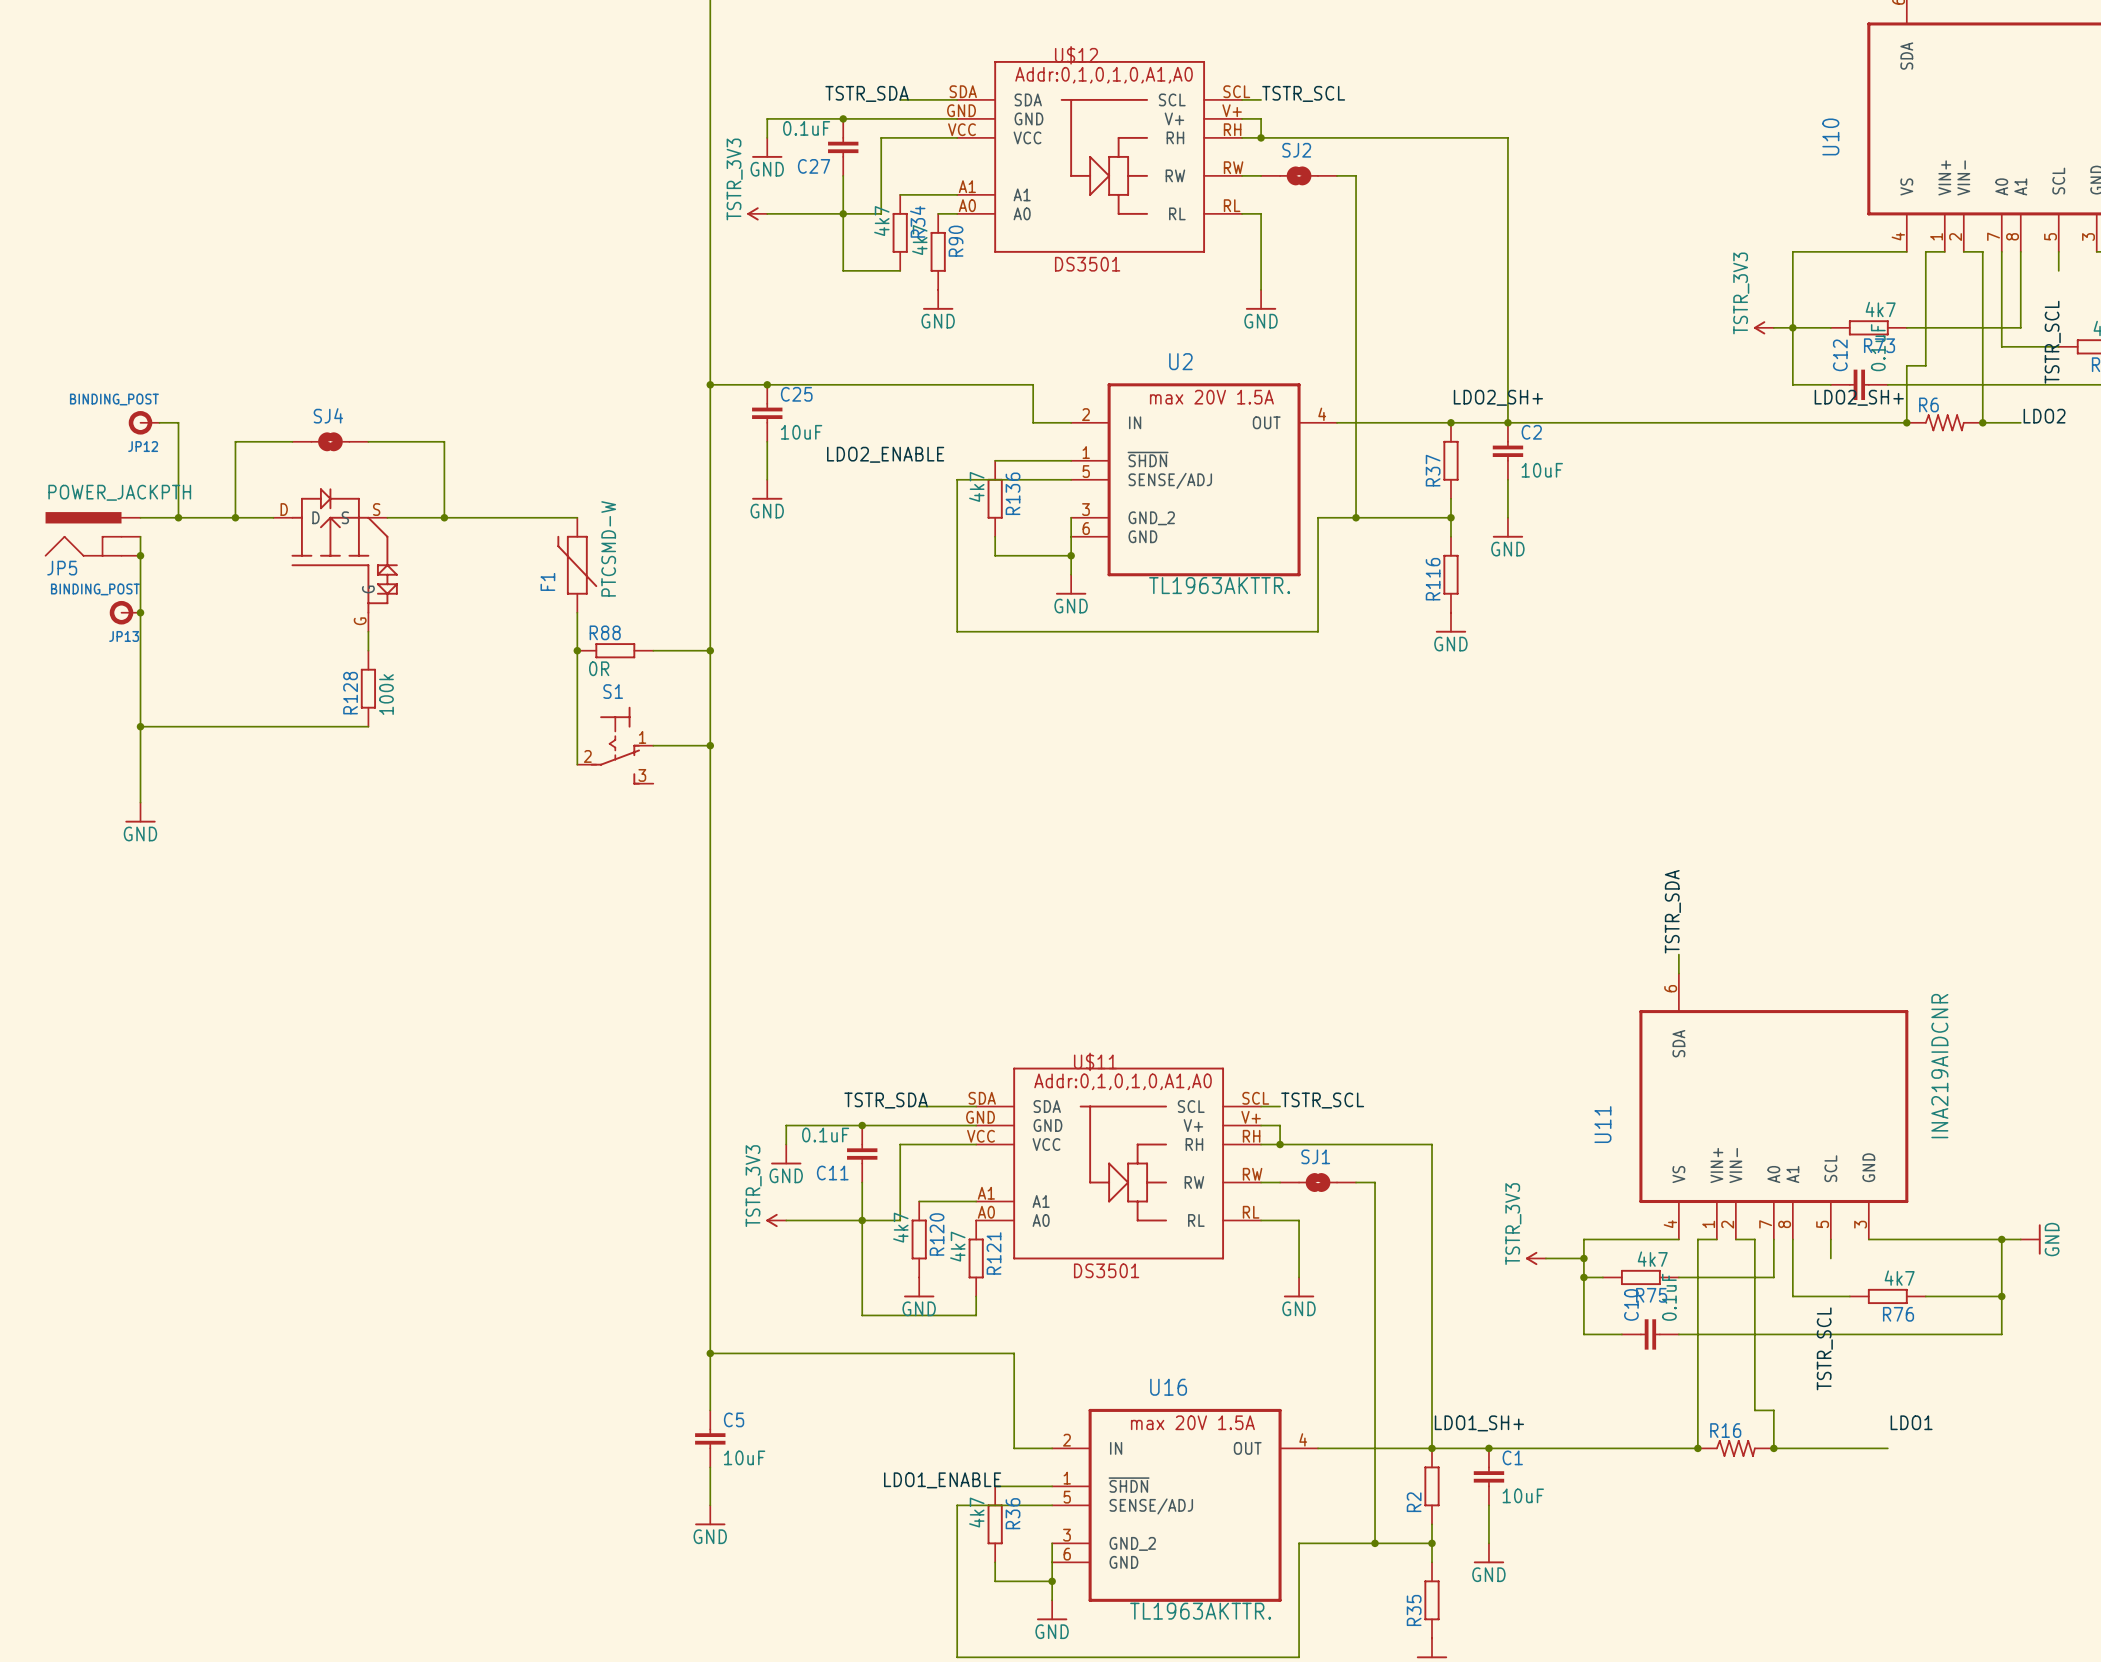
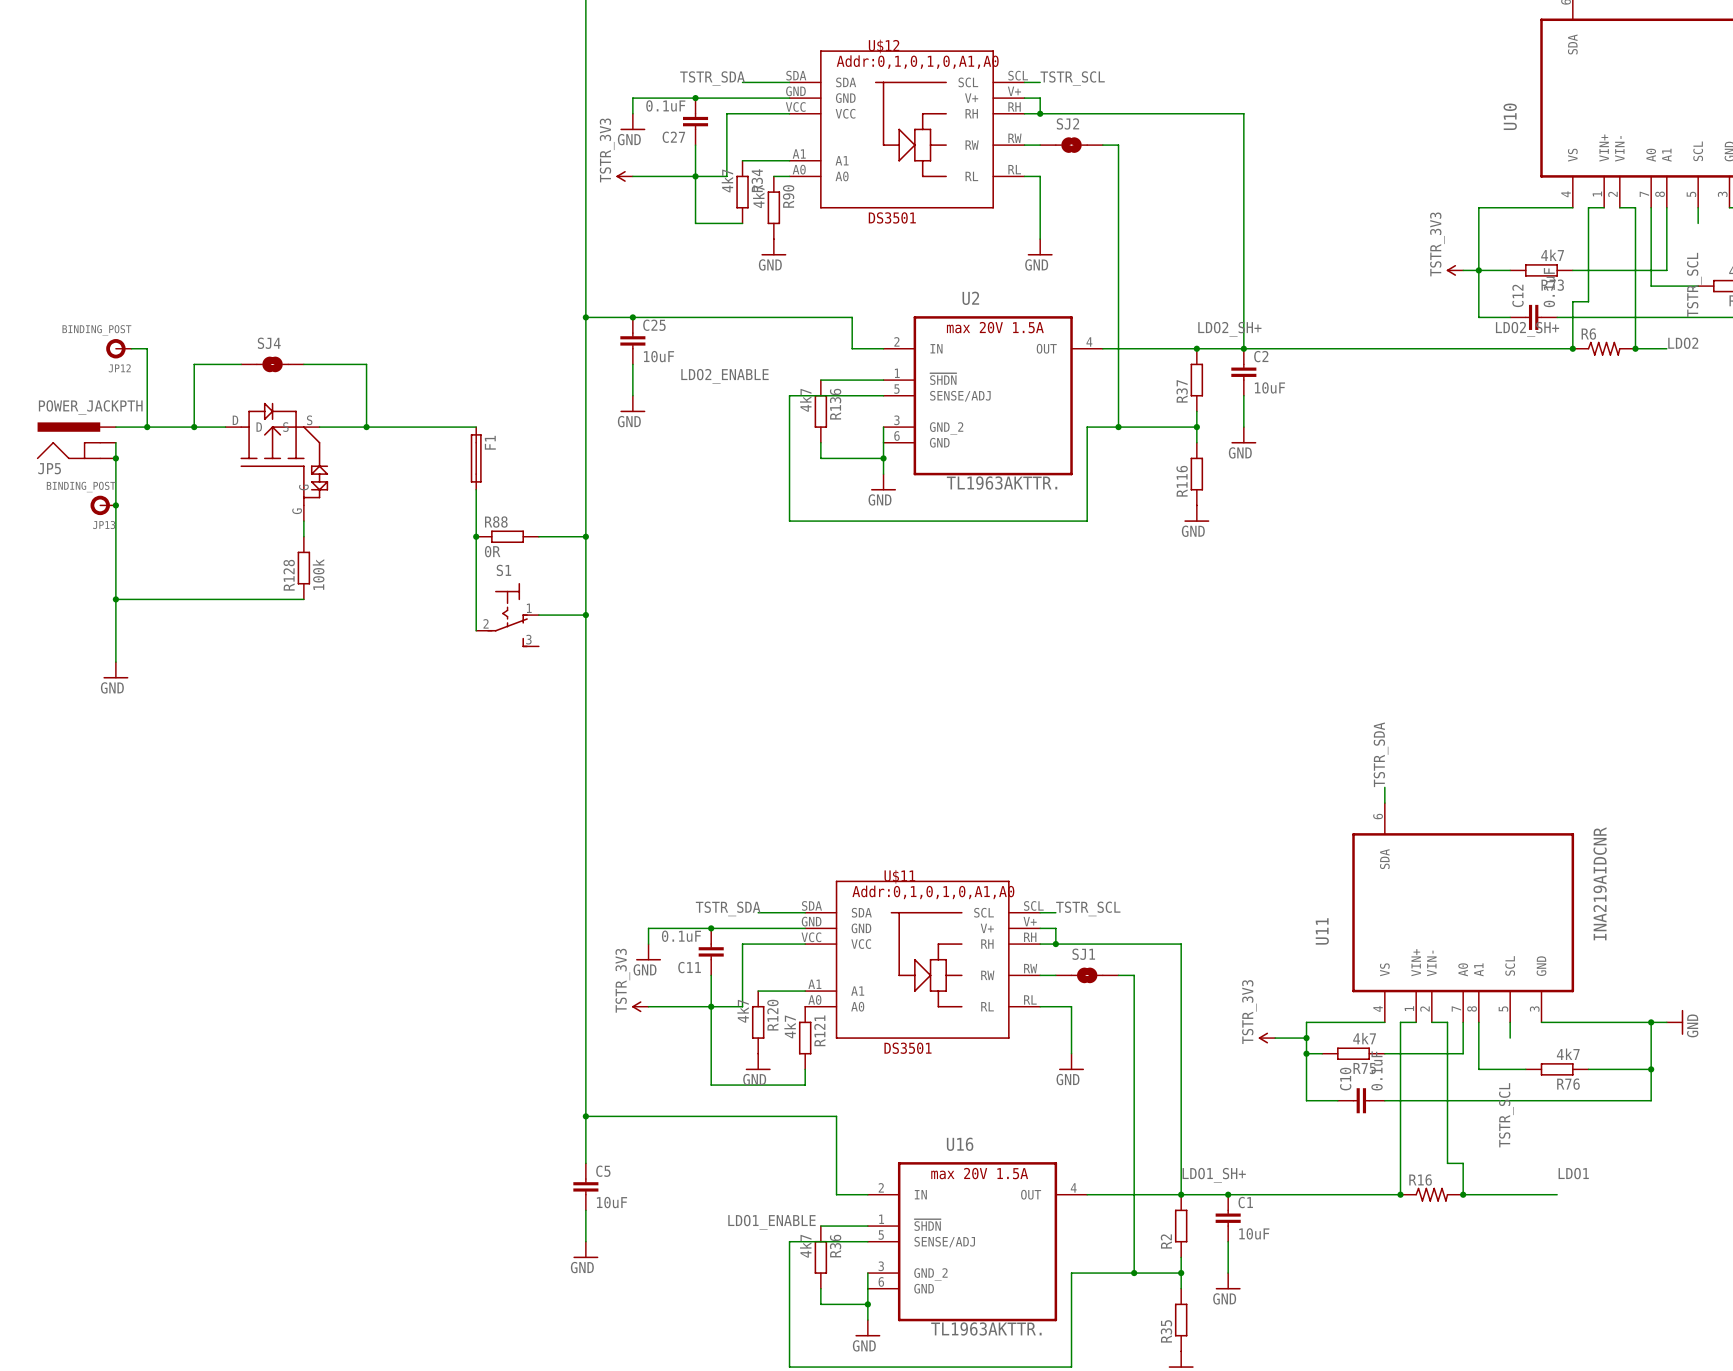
F1 symbol: [557, 517, 598, 613] -> [470, 427, 482, 490]
F1 value: PTCSMD-W (608, 548) -> none
F1 name position: F1 (547, 581) -> F1 (490, 442)

